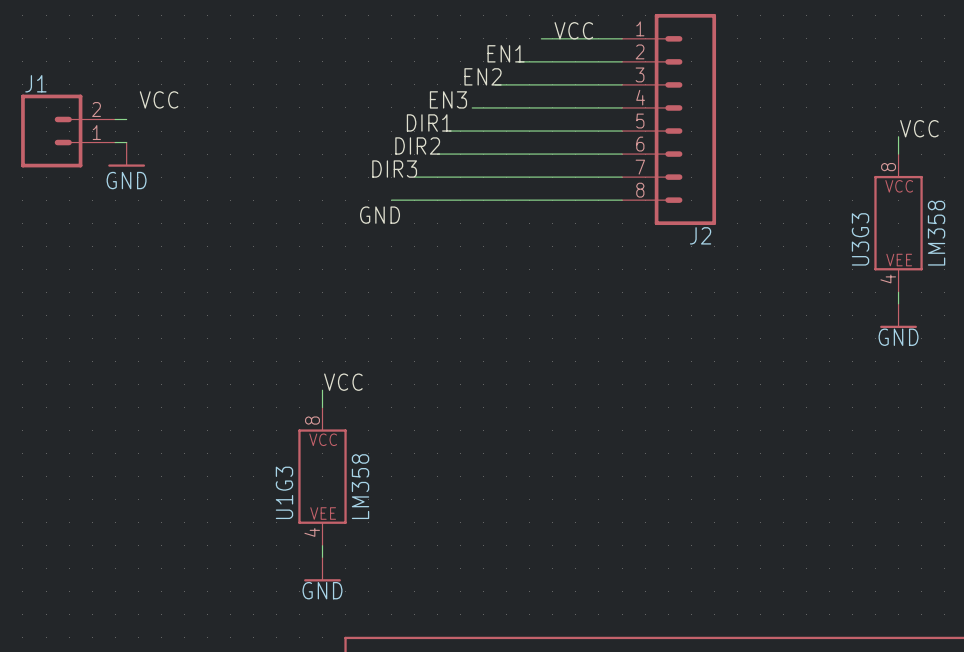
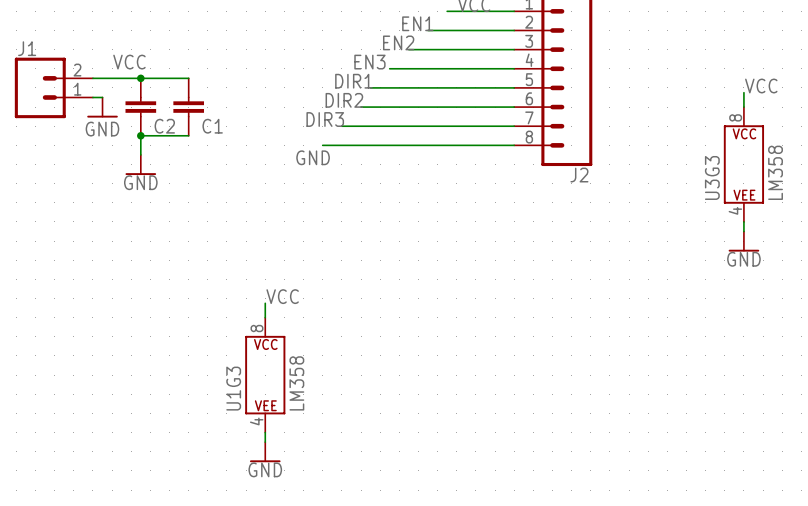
wire: none -> (102, 78) (188, 78)
junction: none -> (140, 78)
C2: none -> (140, 107)
C1: none -> (188, 107)
junction: none -> (140, 135)
wire: none -> (188, 135) (140, 135) (140, 154)
power symbol: none -> GND (140, 164)

